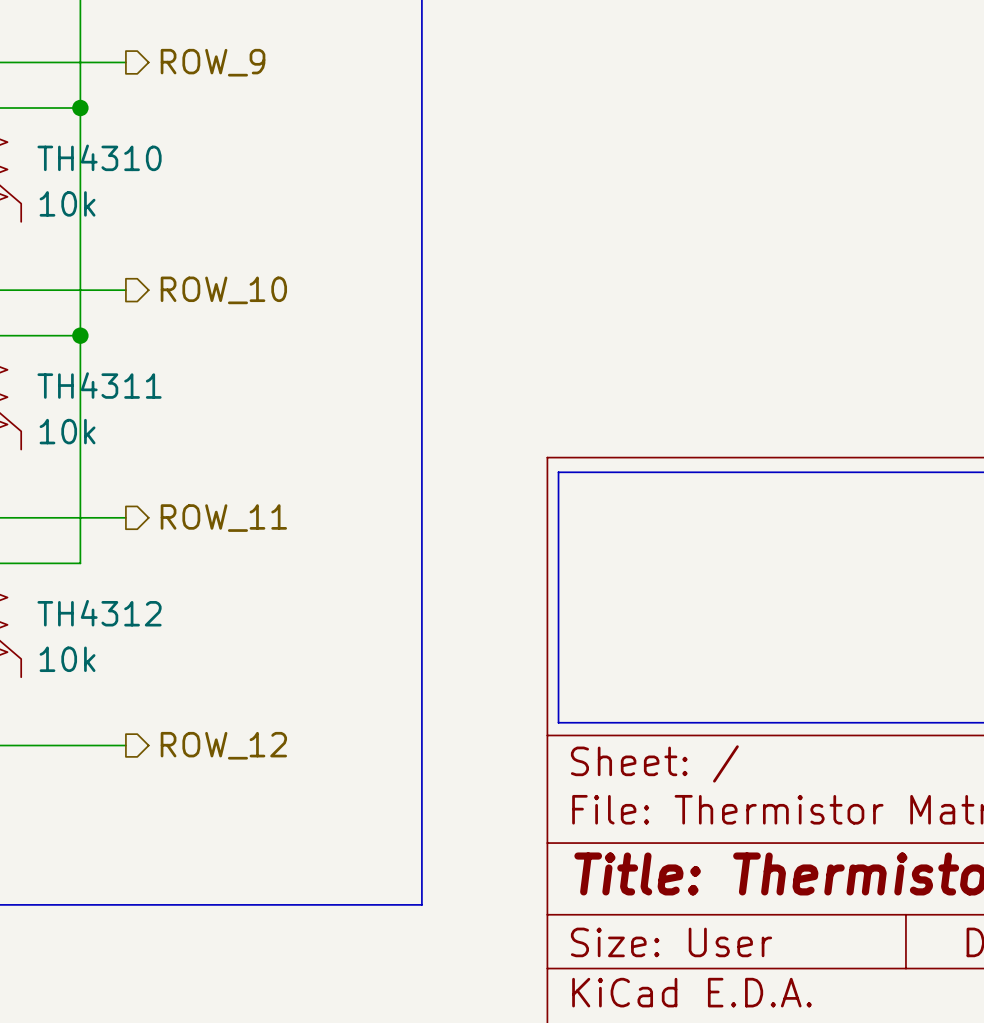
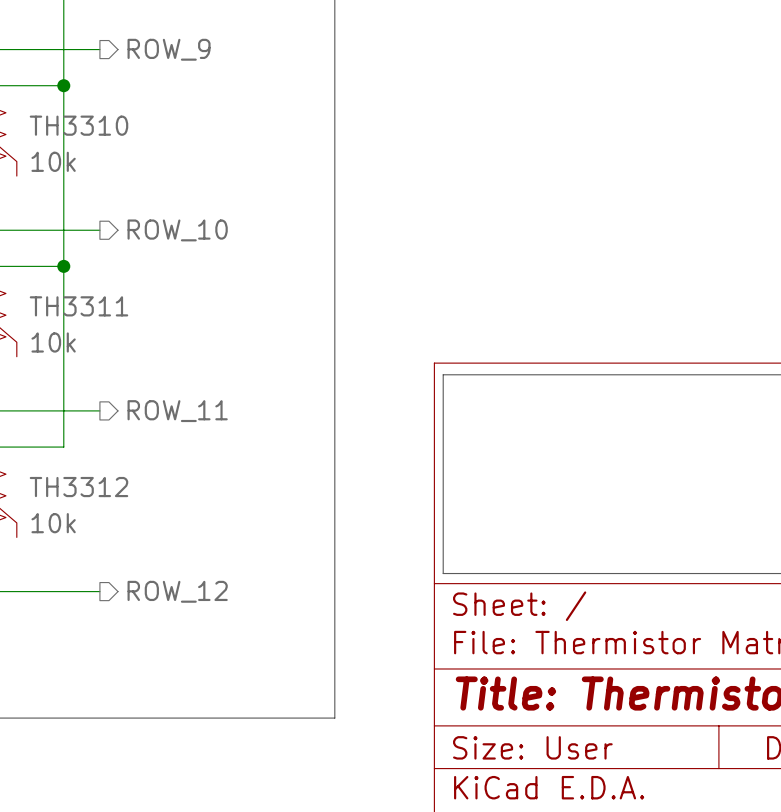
TH4310 name: TH4310 (99, 157) -> TH3310 (78, 125)
TH4311 name: TH4311 (99, 385) -> TH3311 (78, 306)
TH4312 name: TH4312 (99, 613) -> TH3312 (78, 487)

